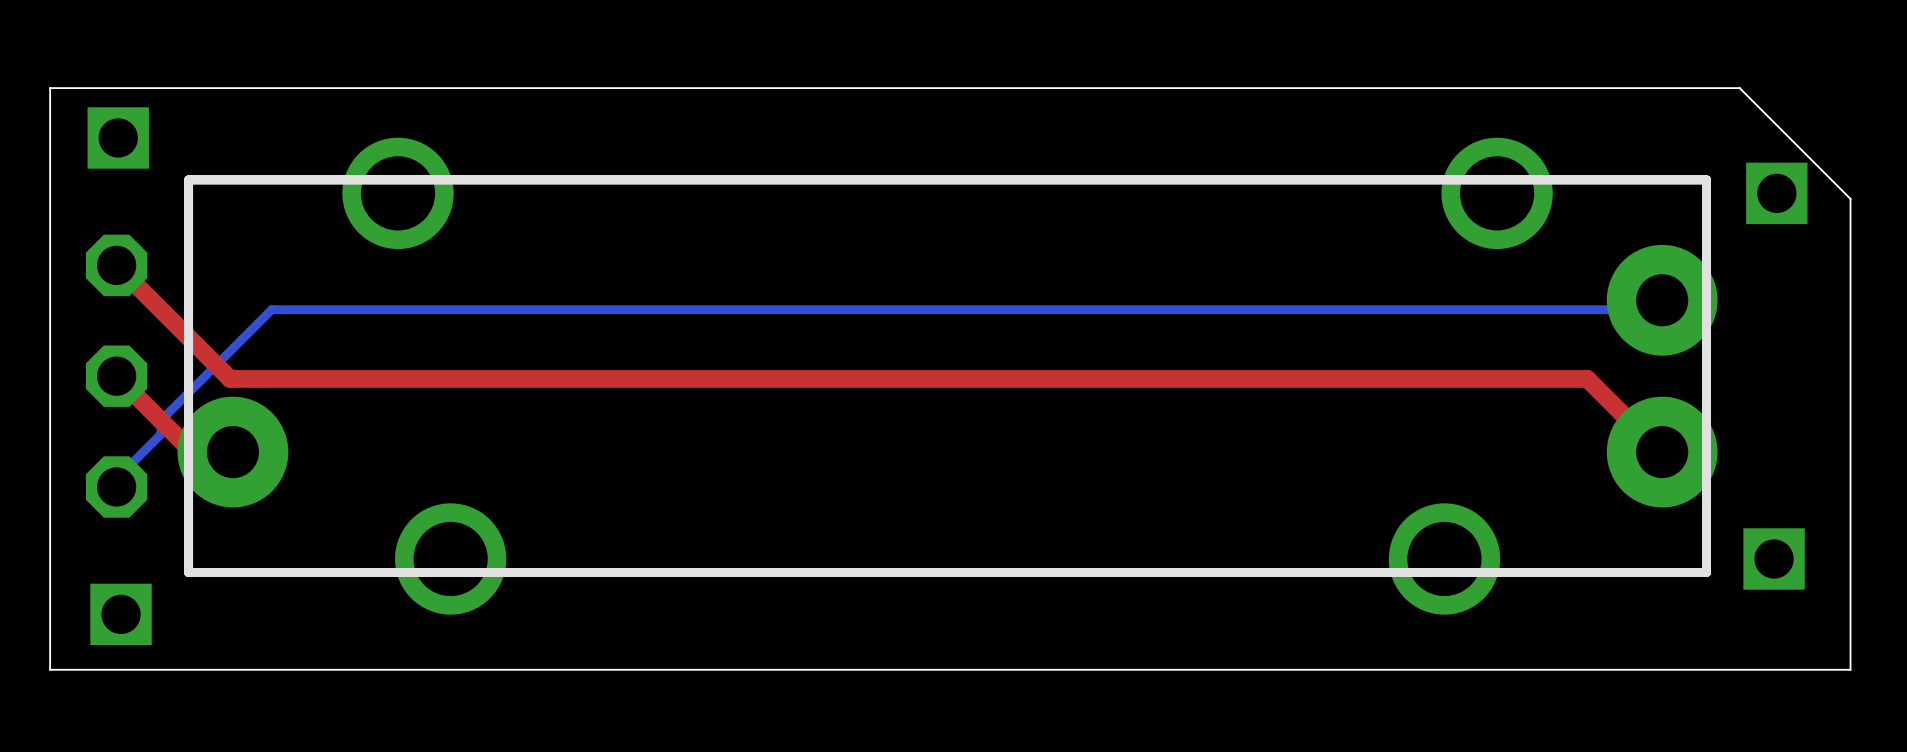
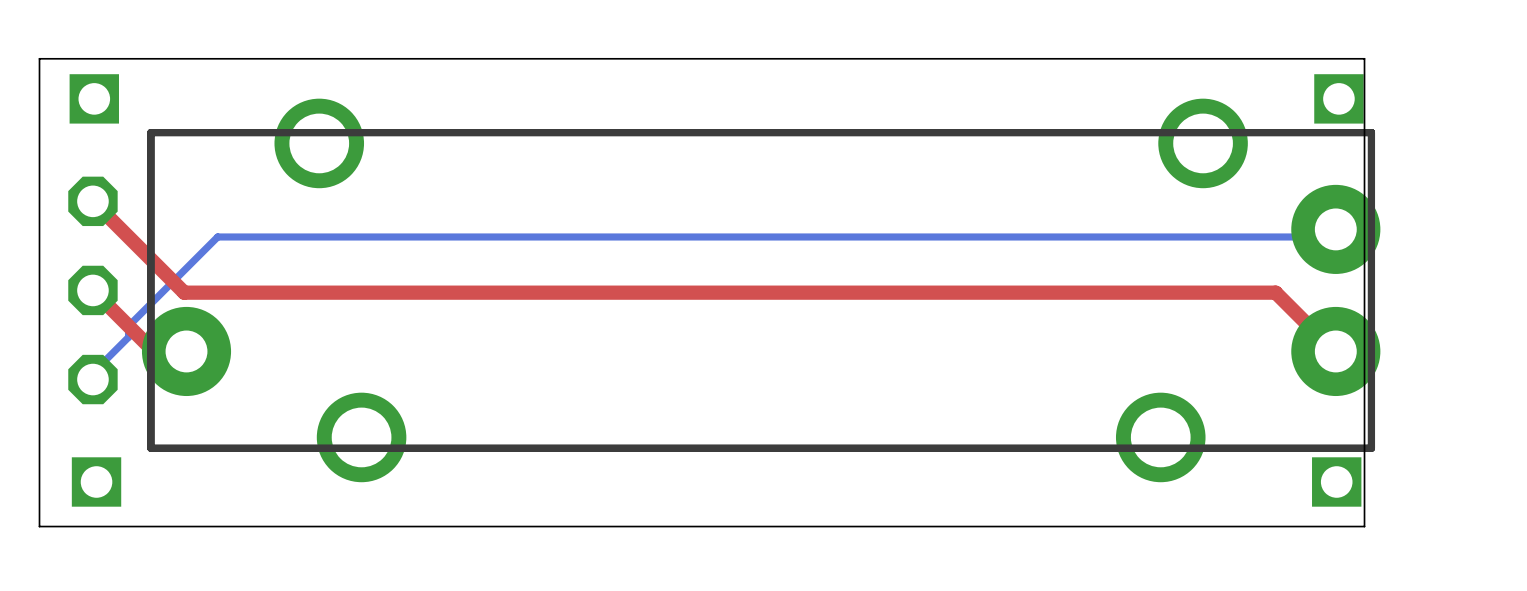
board edge: (1697, 88) (1739, 88) (1850, 198) (1850, 669) (1697, 669) -> (1364, 58) (1364, 526)
part: none -> (721, 290)
part: (946, 376) -> none

